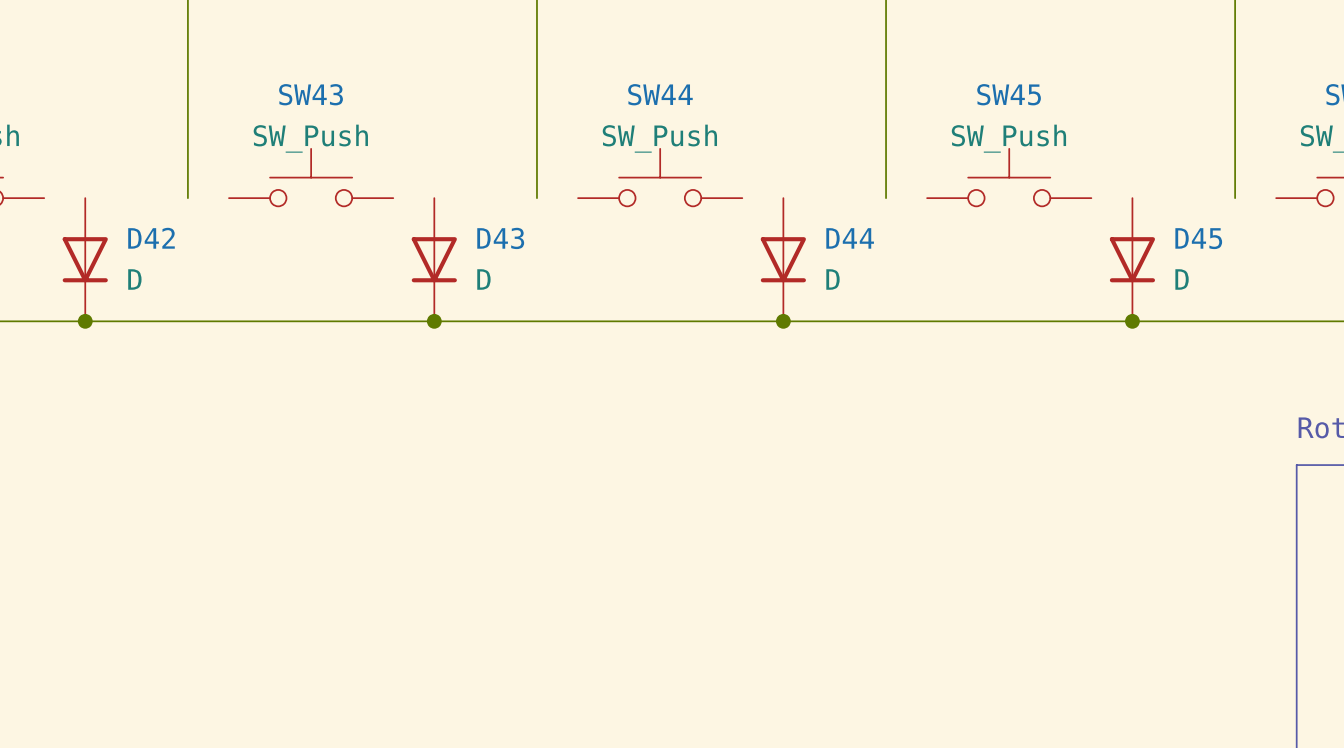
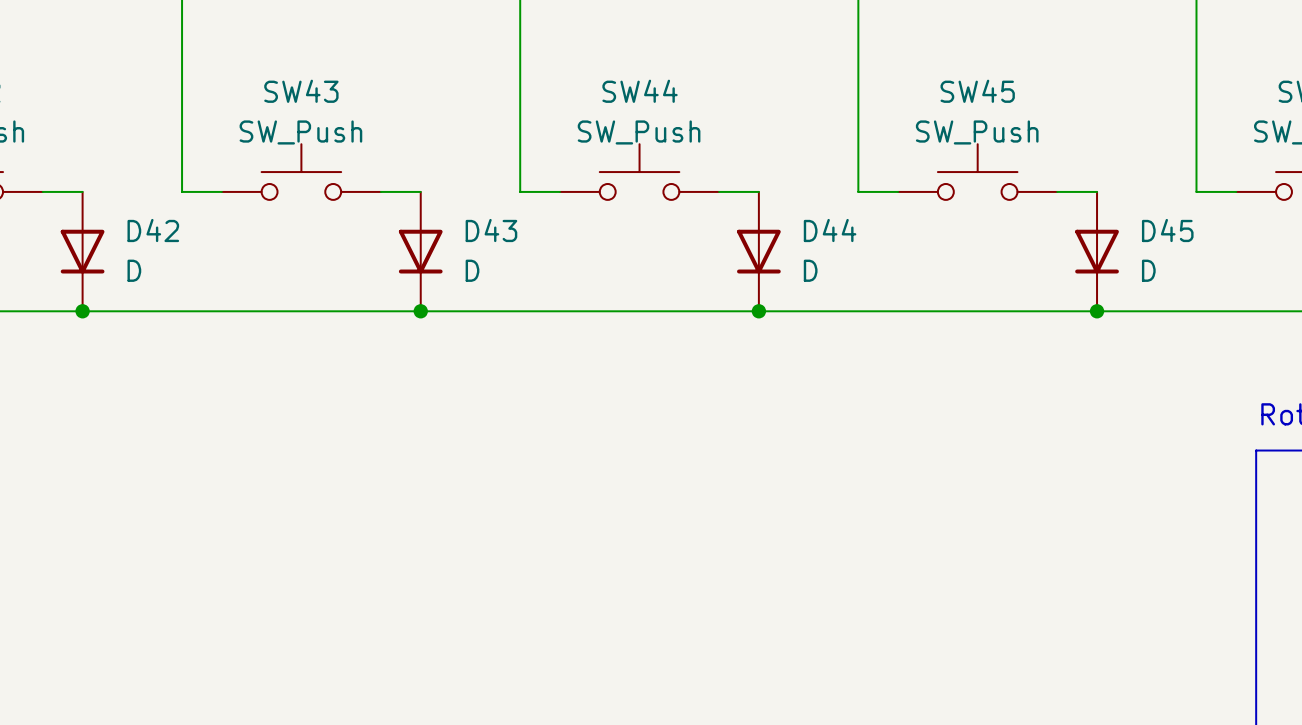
wire: none -> (42, 191) (82, 191)
wire: none -> (182, 191) (221, 191)
wire: none -> (380, 191) (420, 191)
wire: none -> (520, 191) (559, 191)
wire: none -> (719, 191) (758, 191)
wire: none -> (858, 191) (898, 191)
wire: none -> (1057, 191) (1097, 191)
wire: none -> (1196, 191) (1236, 191)

